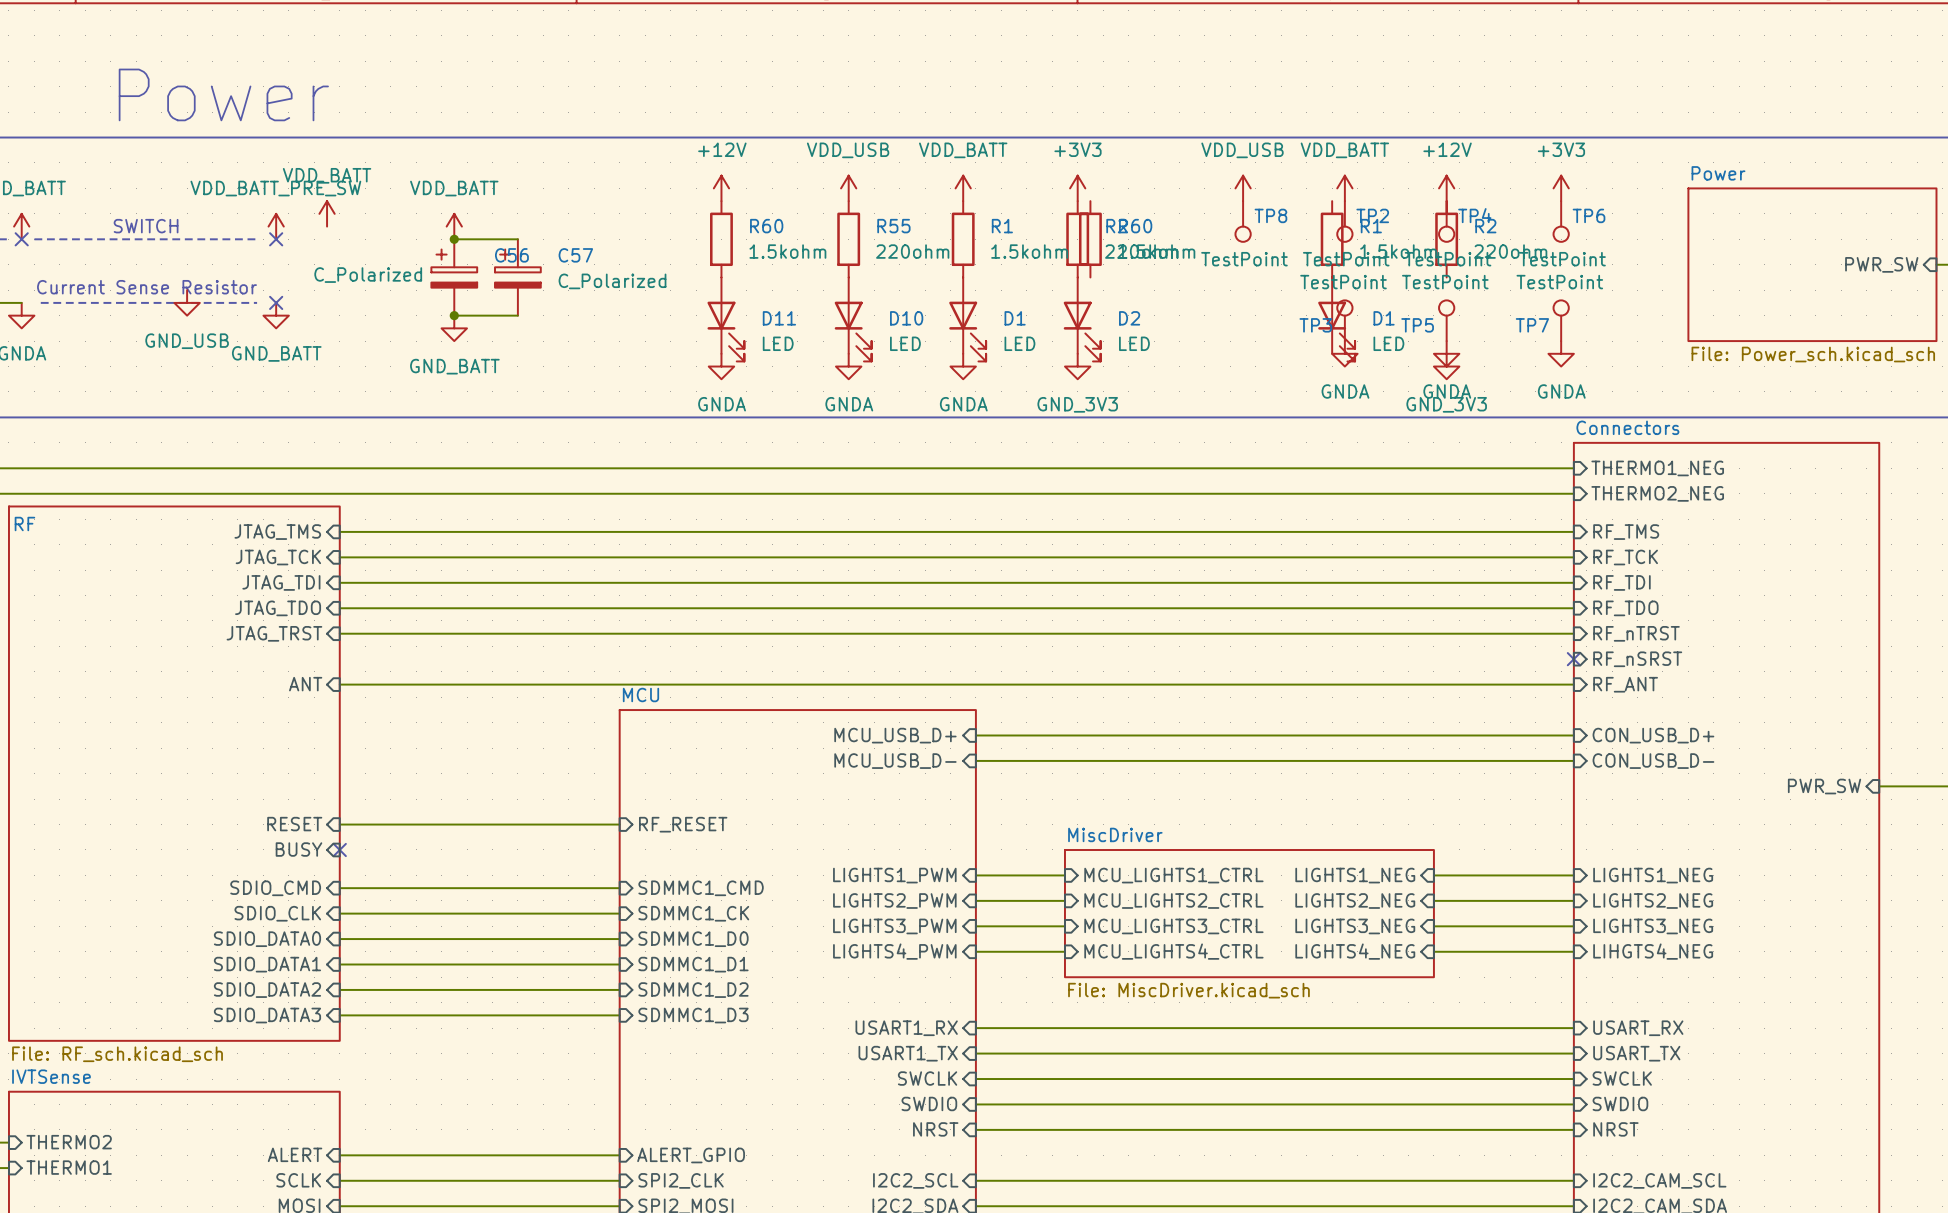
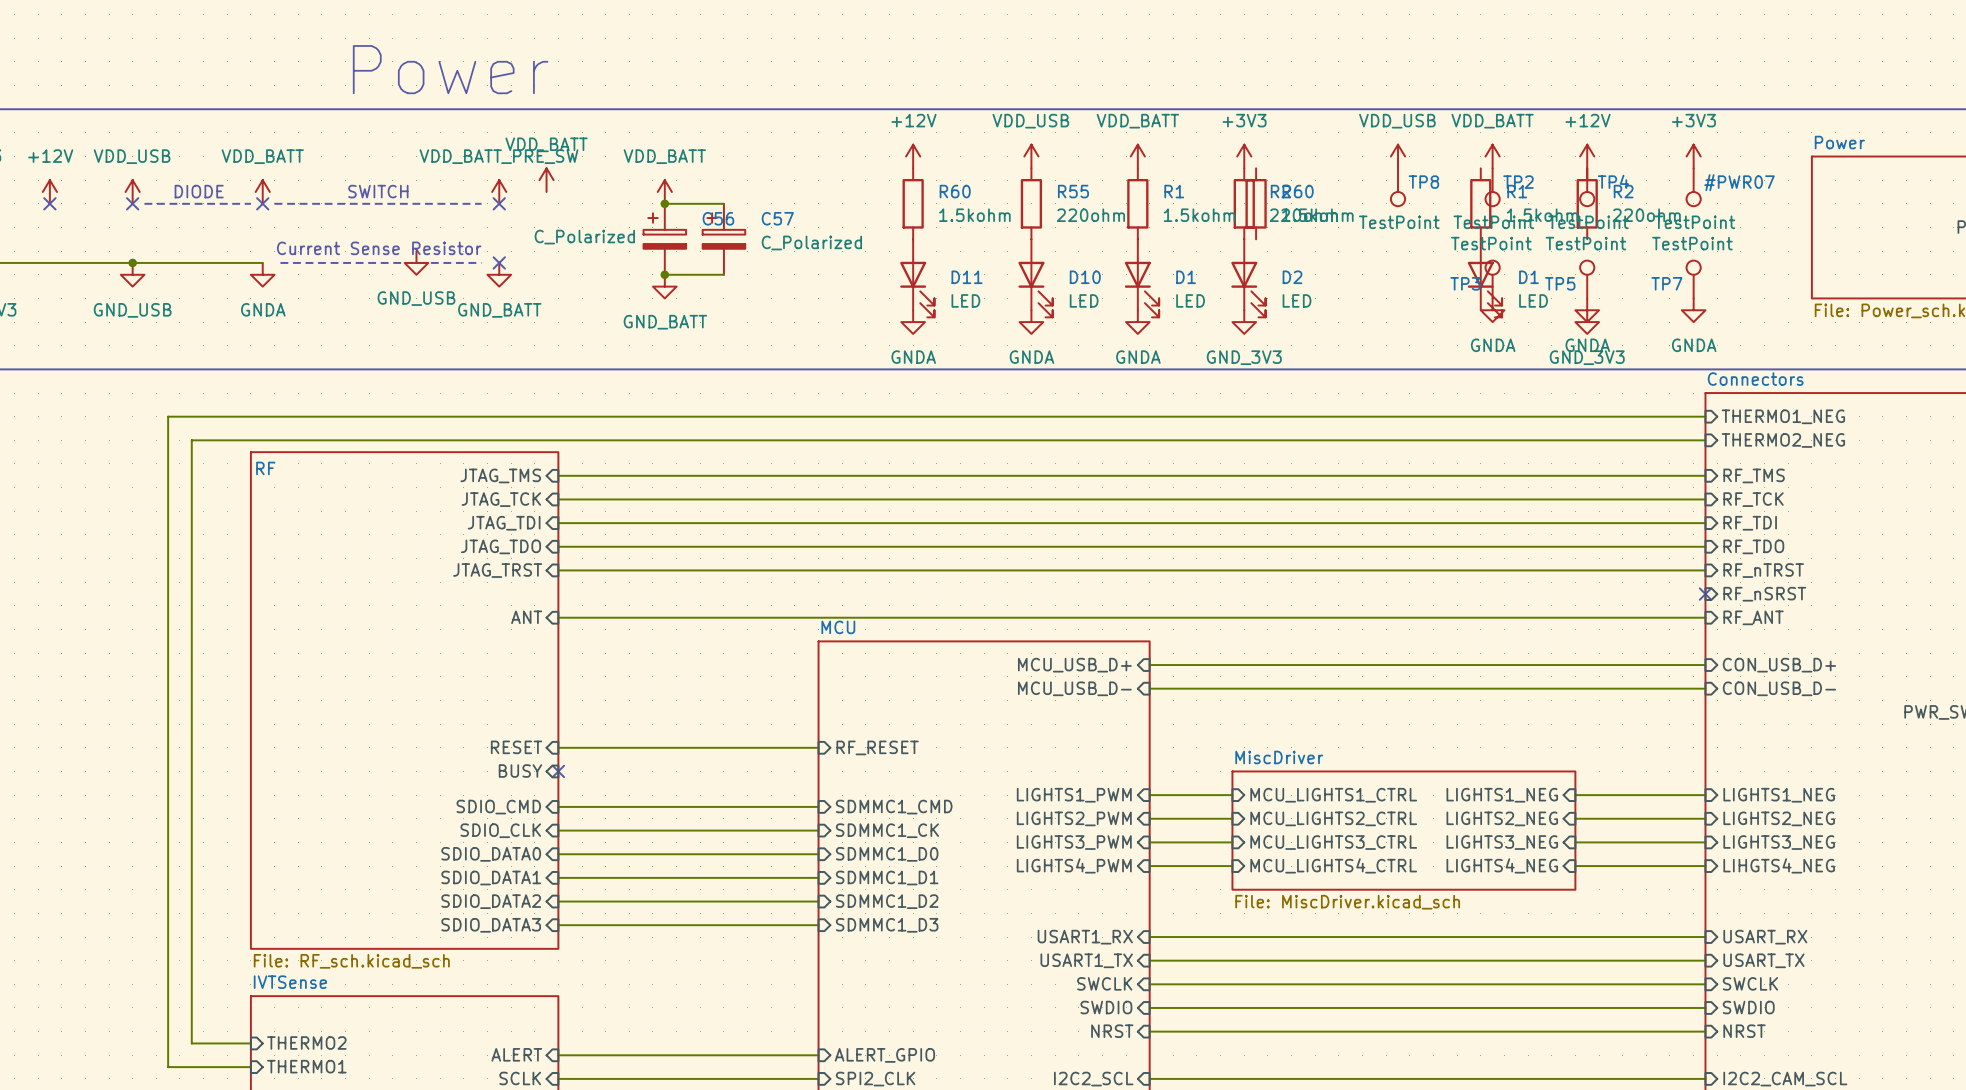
TP6: TestPoint (1561, 221) -> none
#PWR07: none -> TestPoint (1693, 187)

